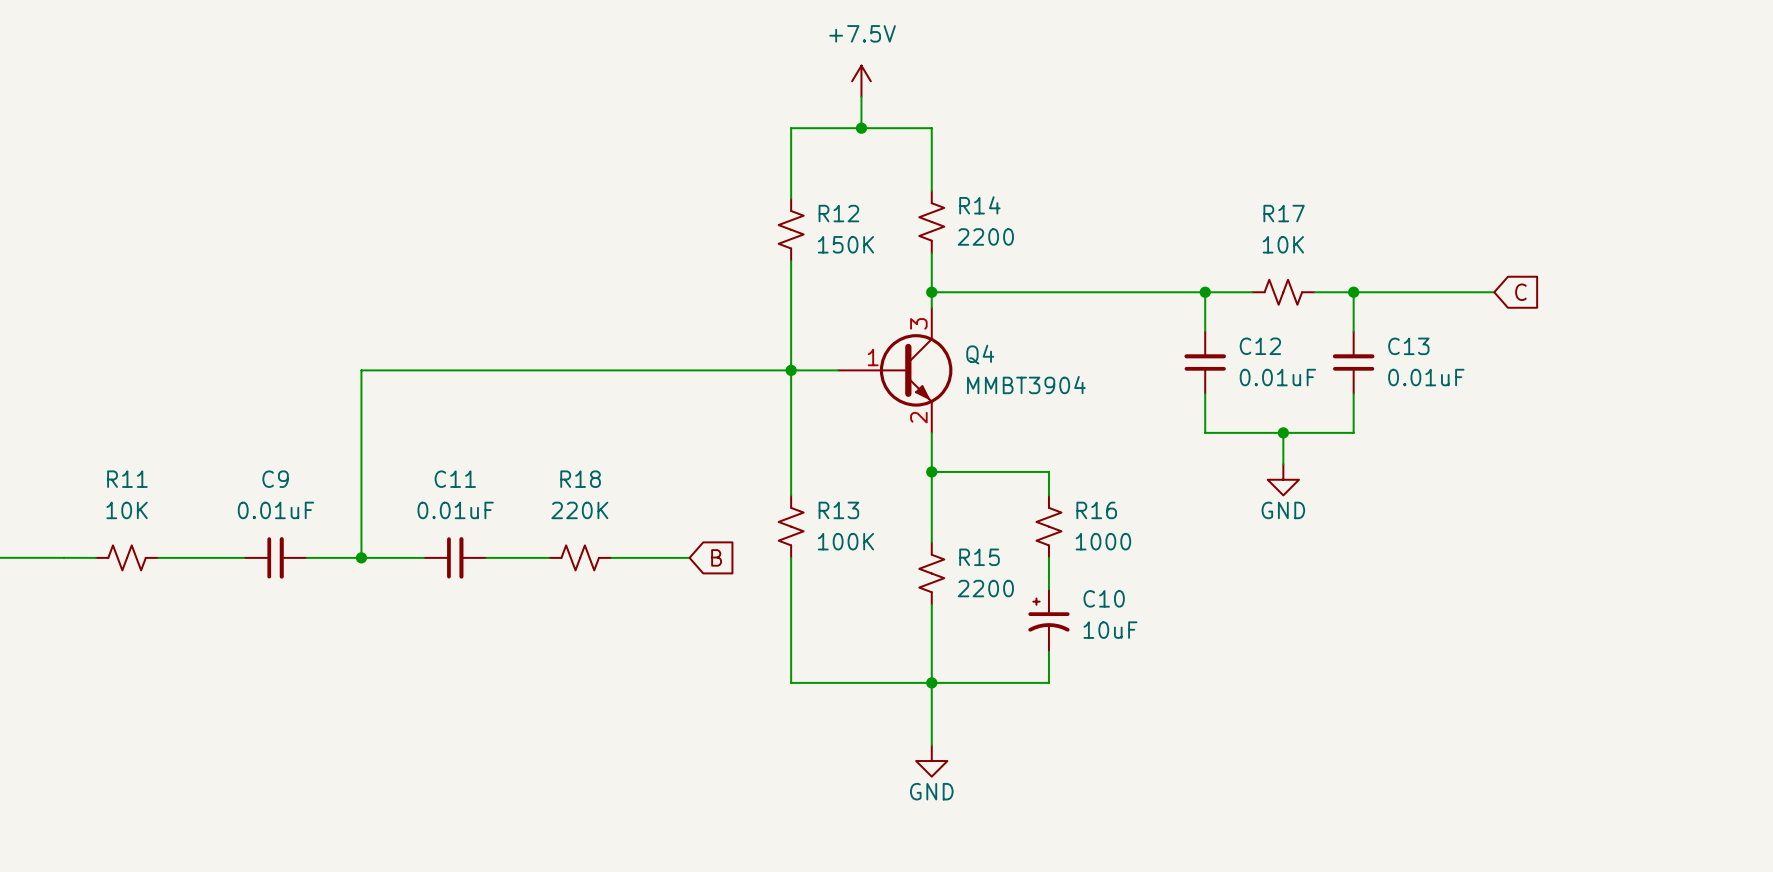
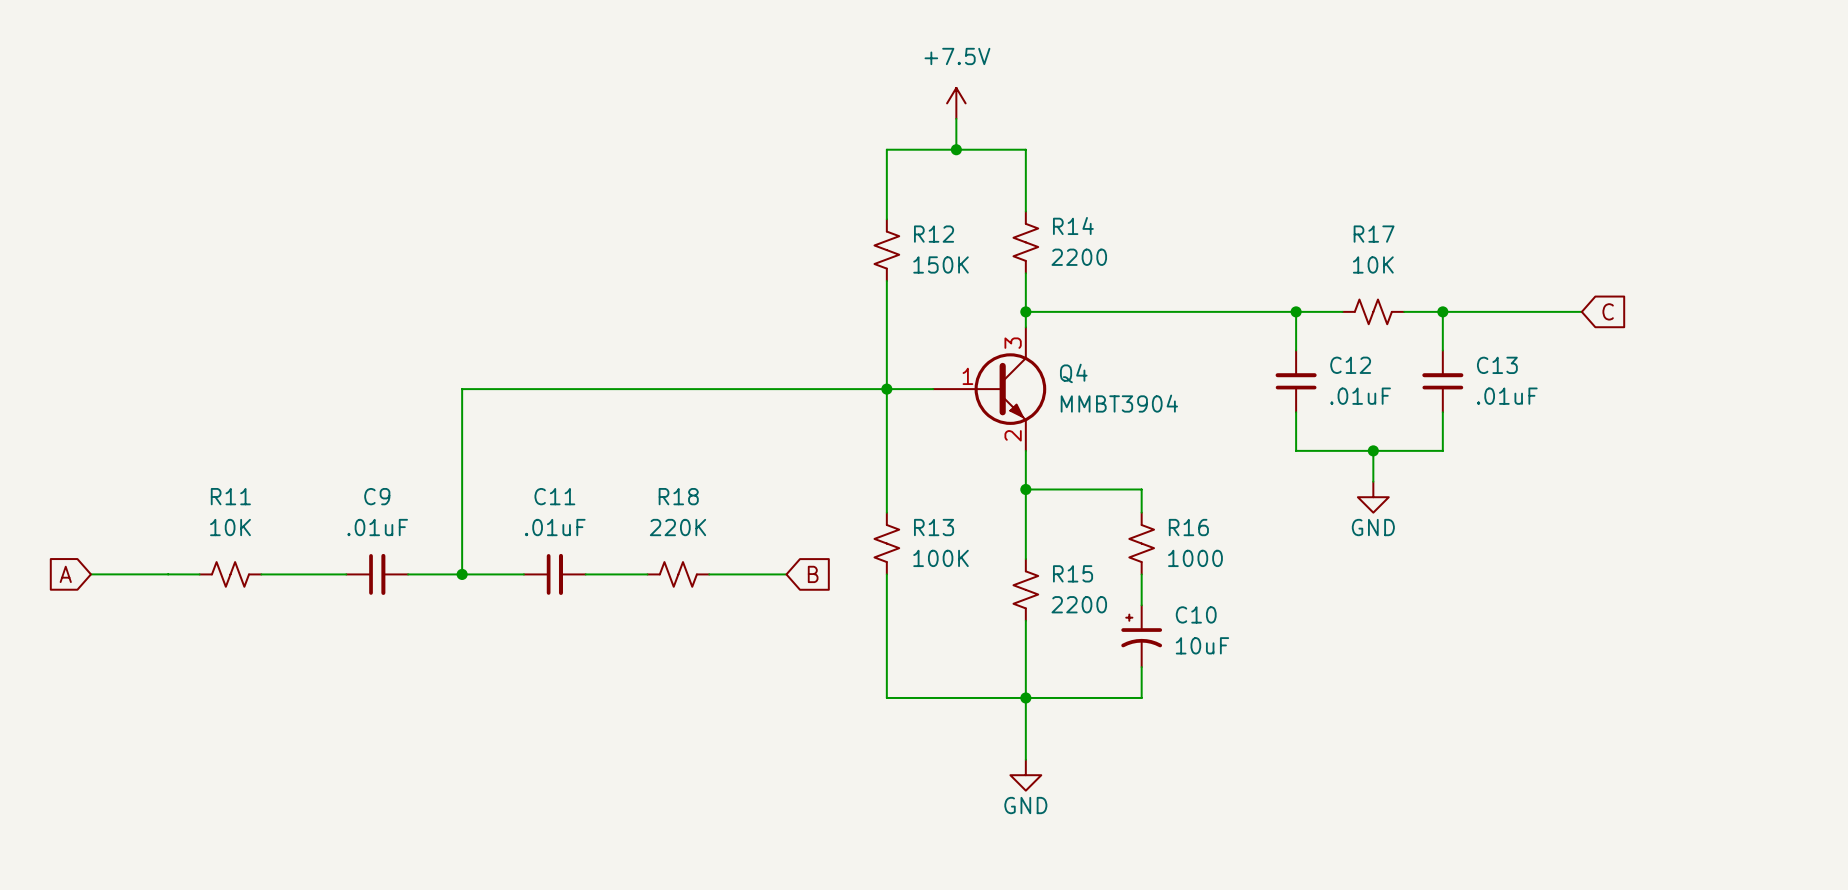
C12 value: 0.01uF (1277, 377) -> .01uF (1360, 396)
C13 value: 0.01uF (1426, 377) -> .01uF (1507, 396)
C9 value: 0.01uF (275, 510) -> .01uF (377, 527)
C11 value: 0.01uF (455, 510) -> .01uF (555, 527)

